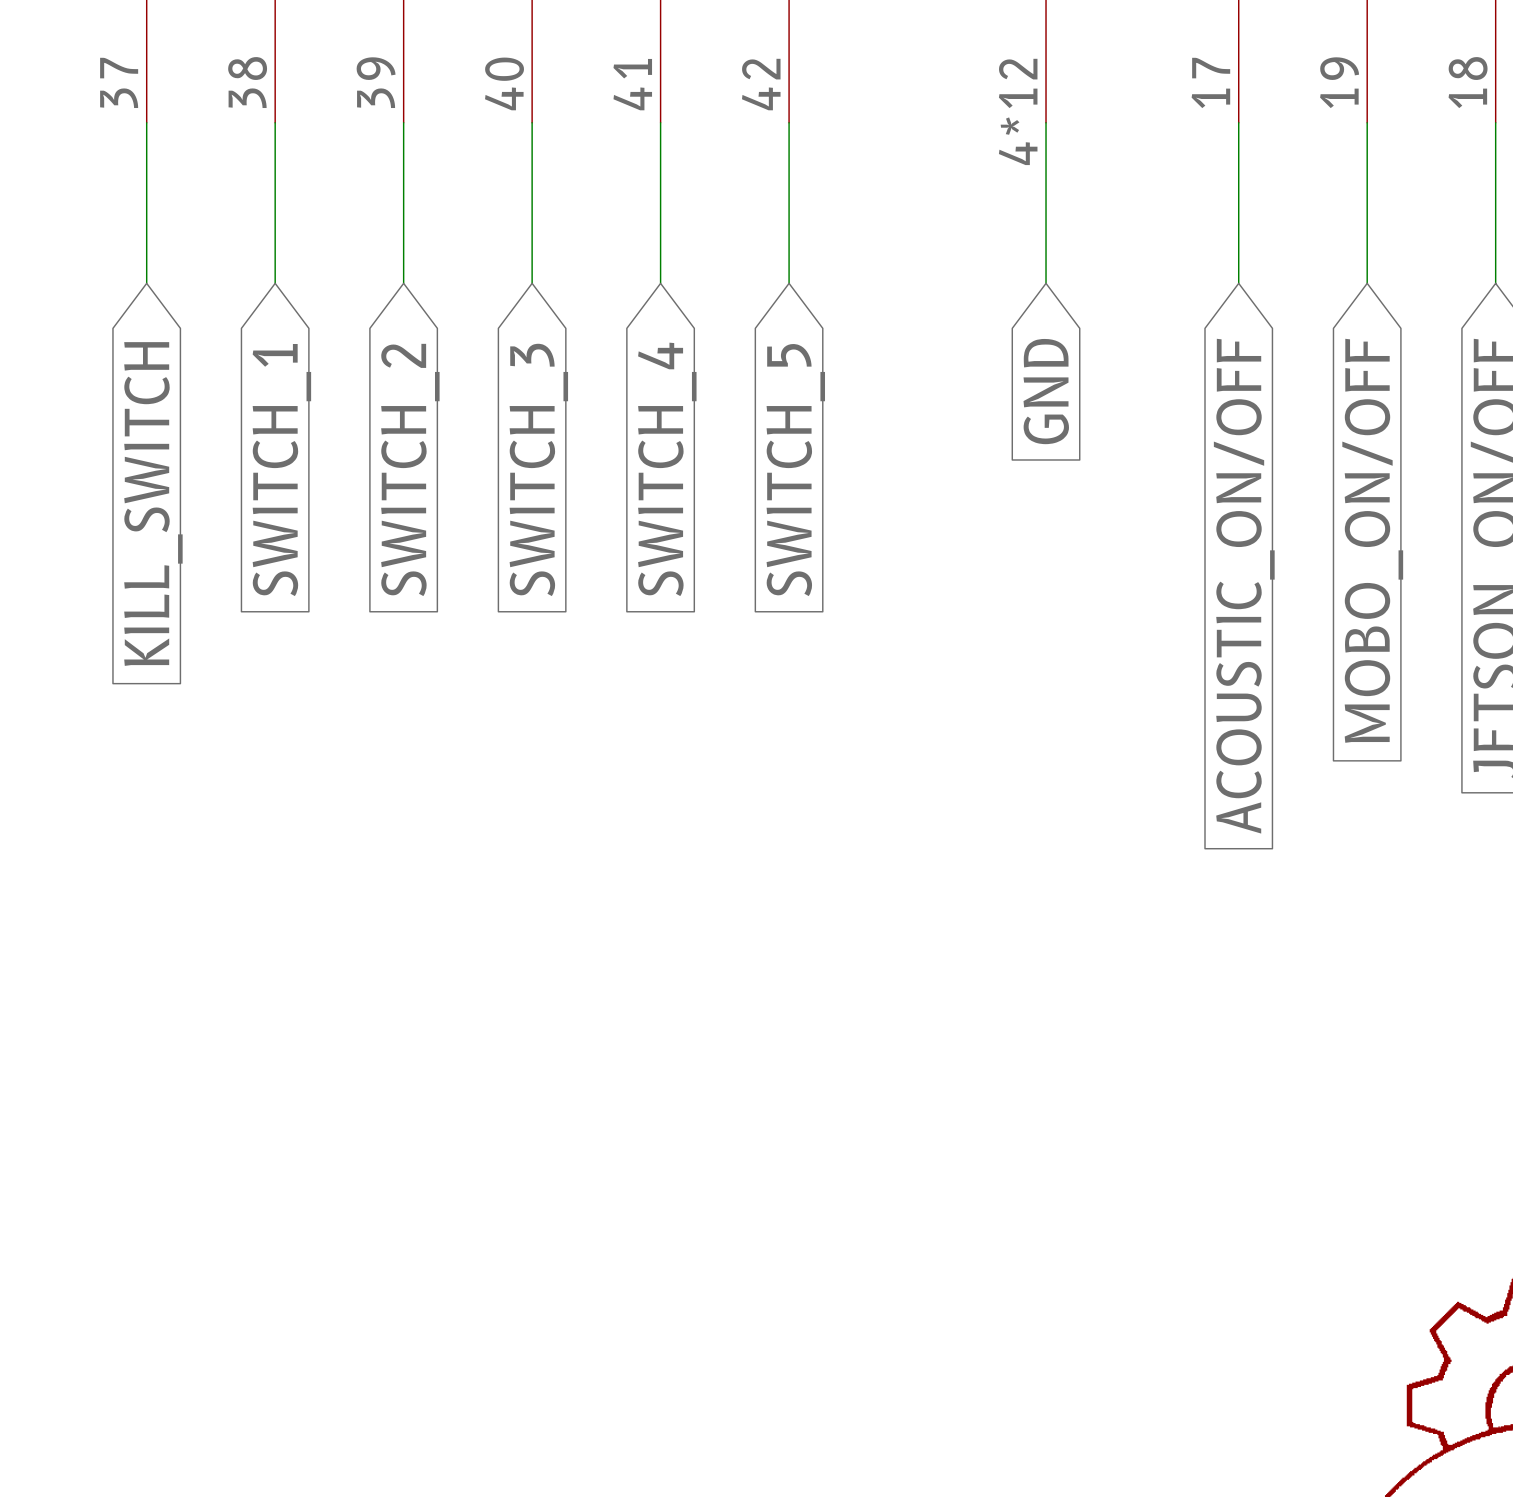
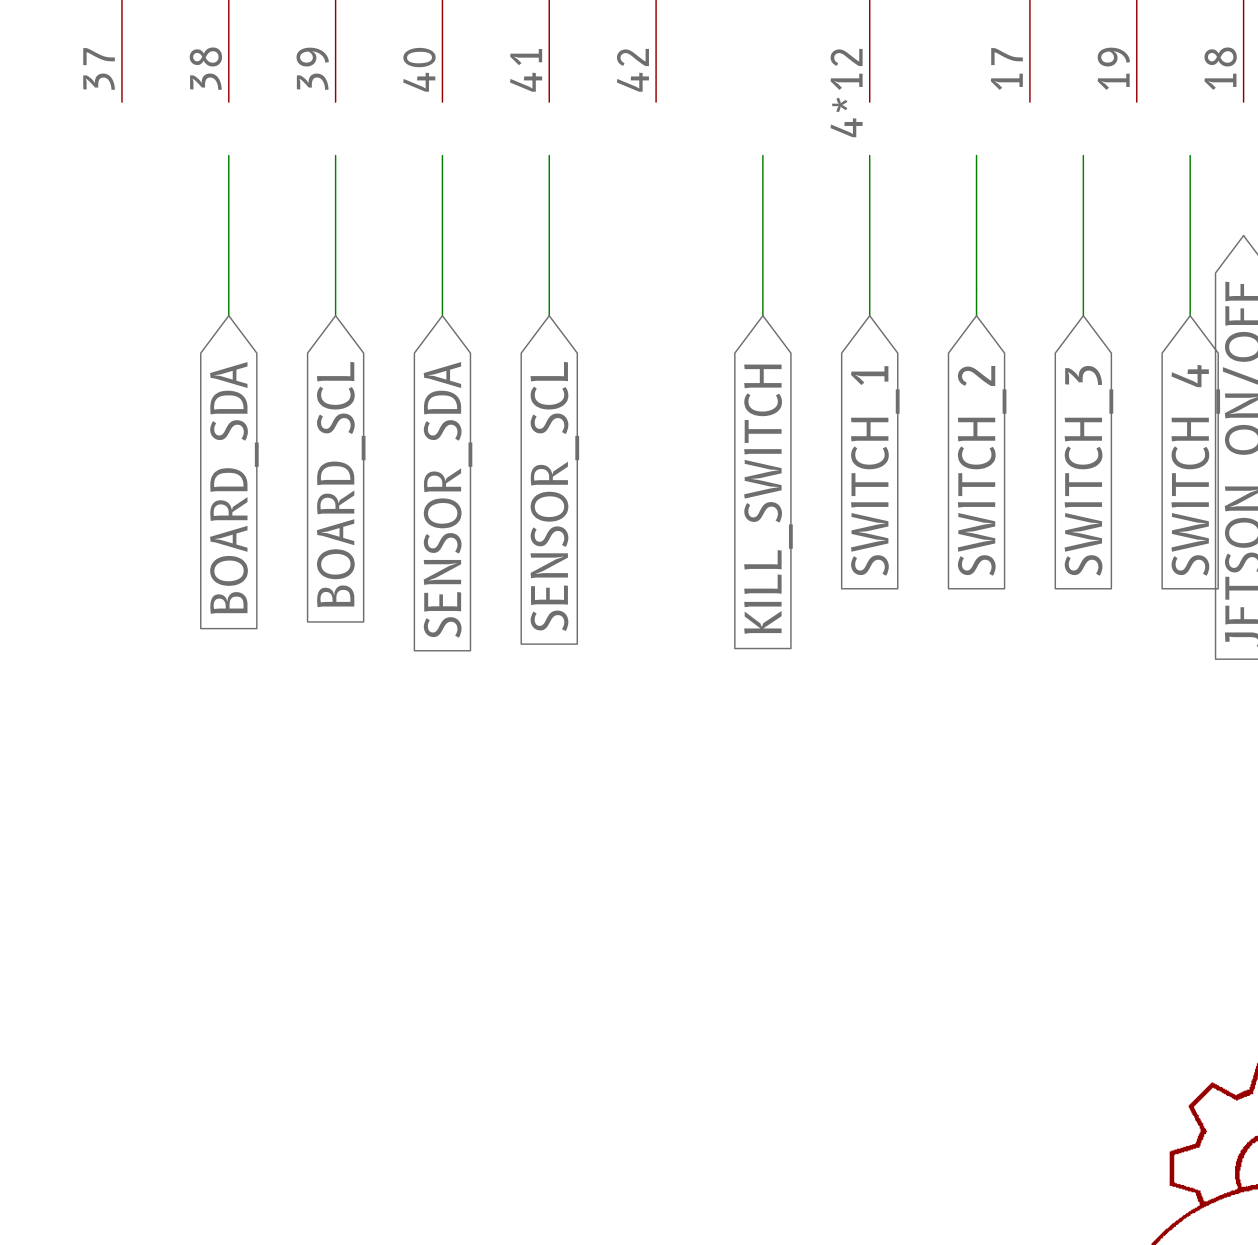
wire: (146, 122) (146, 283) -> none
wire: (275, 122) (275, 187) -> none
wire: (403, 122) (403, 187) -> none
wire: (532, 122) (532, 187) -> none
wire: (660, 122) (660, 187) -> none
wire: (789, 122) (789, 283) -> none
wire: (1046, 122) (1046, 187) -> none
wire: (1238, 122) (1238, 283) -> none
wire: (1367, 122) (1367, 283) -> none
wire: (1495, 122) (1495, 283) -> none
wire: none -> (762, 155) (762, 315)
wire: none -> (976, 155) (976, 315)
wire: none -> (1083, 155) (1083, 315)
wire: none -> (1190, 155) (1190, 315)
wire: none -> (228, 235) (228, 315)
wire: none -> (335, 235) (335, 315)
wire: none -> (442, 235) (442, 315)
wire: none -> (549, 235) (549, 315)
wire: none -> (869, 235) (869, 315)
global label: GND (1046, 391) -> none
global label: SWITCH_2 (410, 469) -> none
global label: SWITCH_3 (538, 469) -> none
global label: SWITCH_4 (667, 469) -> none
global label: SWITCH_1 (281, 470) -> none
global label: SWITCH_5 (795, 470) -> none
global label: KILL_SWITCH (153, 504) -> none
global label: MOBO_ON/OFF (1372, 540) -> none
global label: none -> SWITCH_4 (1195, 470)
global label: none -> SWITCH_1 (875, 470)
global label: none -> SWITCH_2 (982, 470)
global label: none -> SWITCH_3 (1088, 470)
global label: none -> BOARD_SCL (341, 484)
global label: none -> BOARD_SDA (234, 487)
global label: ACOUSTIC_ON/OFF (1244, 586) -> none
global label: none -> SENSOR_SCL (554, 496)
global label: none -> KILL_SWITCH (768, 499)
global label: none -> SENSOR_SDA (448, 499)

